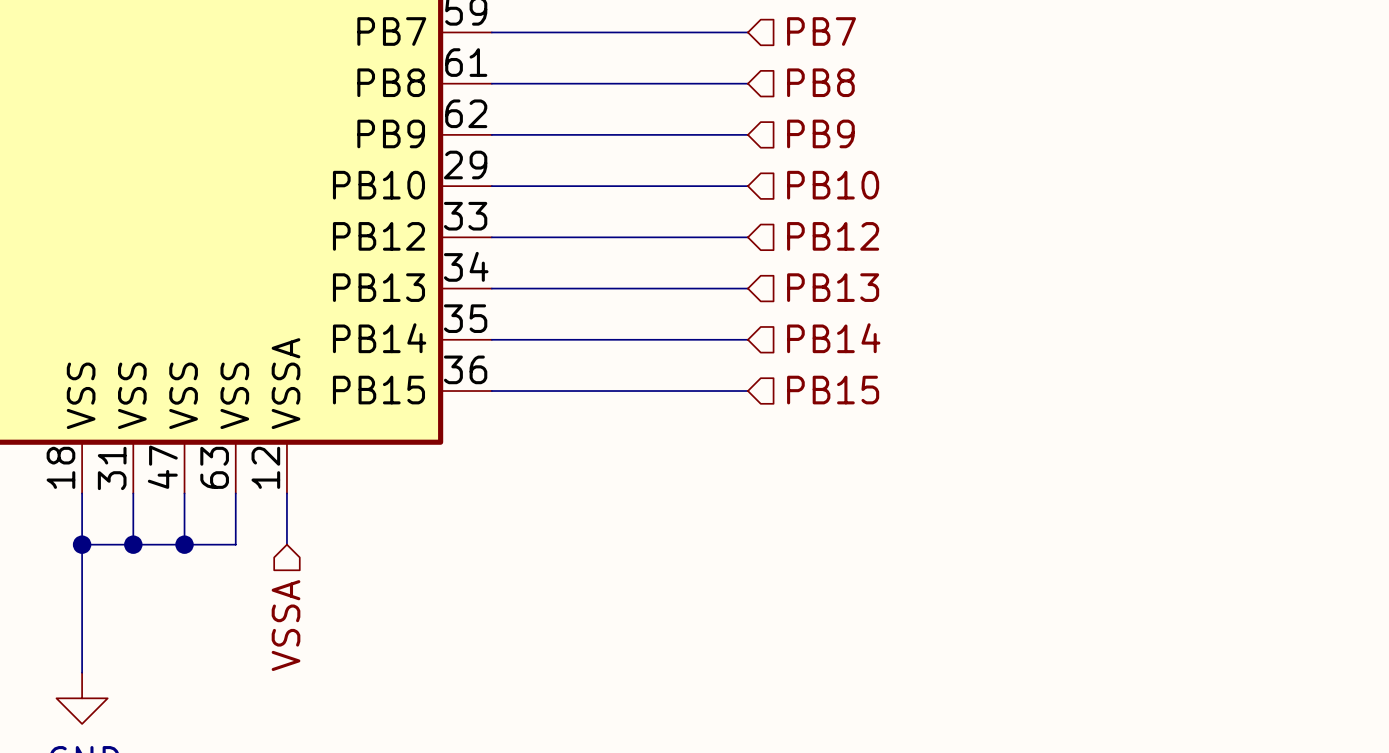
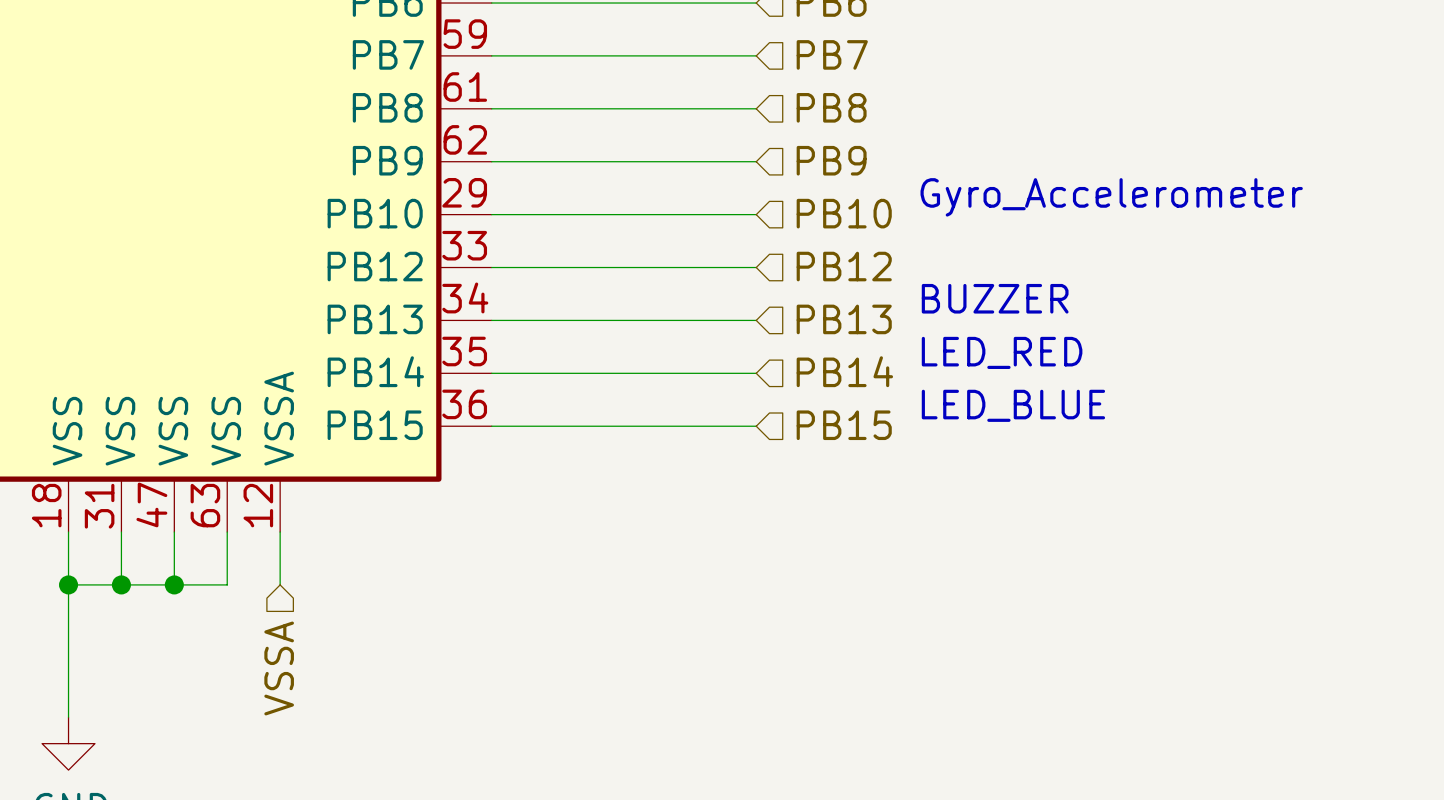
text: none -> Gyro_Accelerometer (1111, 197)
text: none -> BUZZER (995, 298)
text: none -> LED_RED (1002, 352)
text: none -> LED_BLUE (1013, 405)

